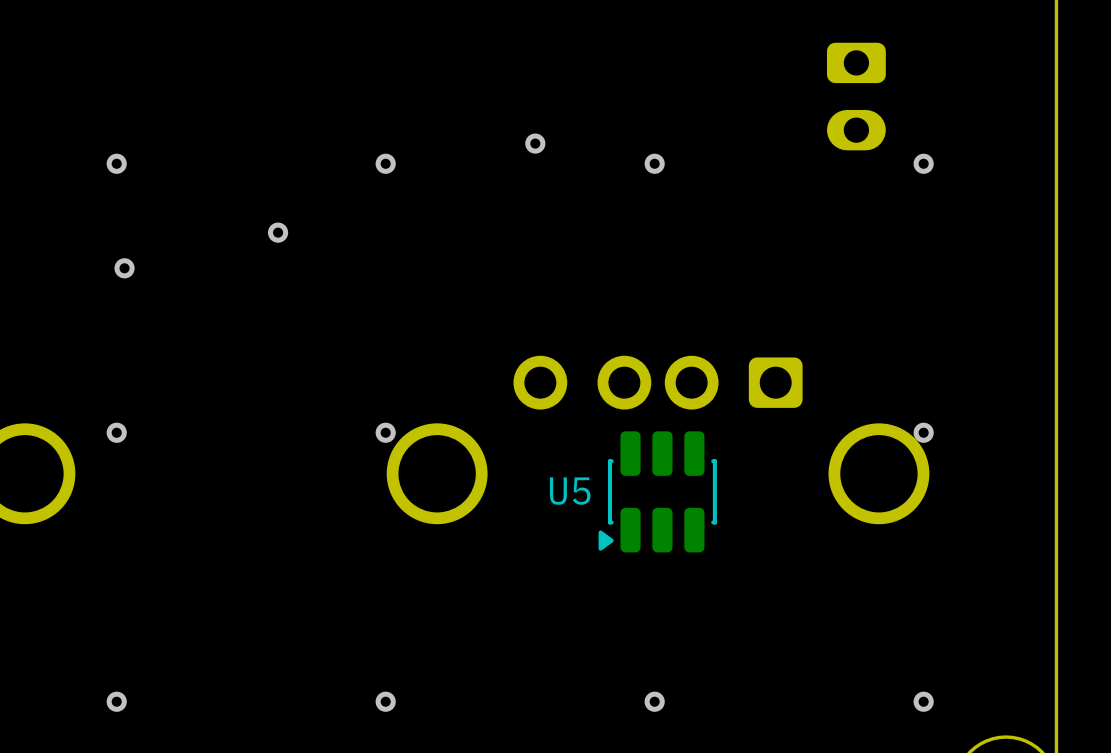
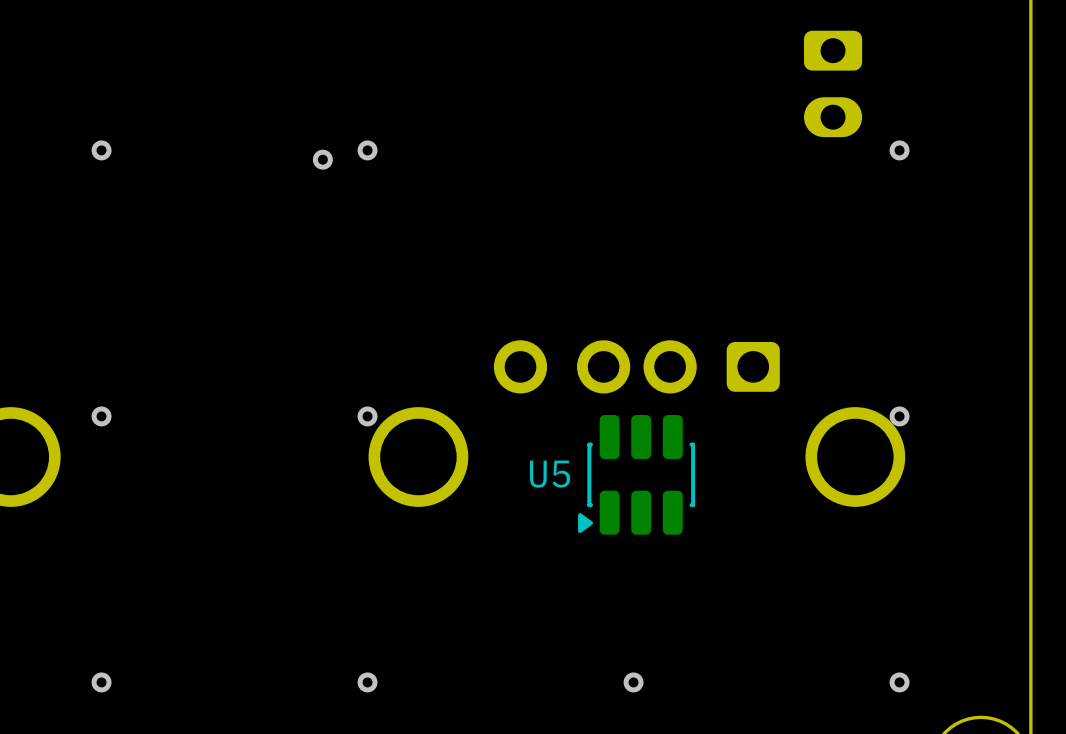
via: (535, 143) -> none
via: (654, 163) -> none
via position: (278, 232) -> (322, 159)
via: (124, 268) -> none

